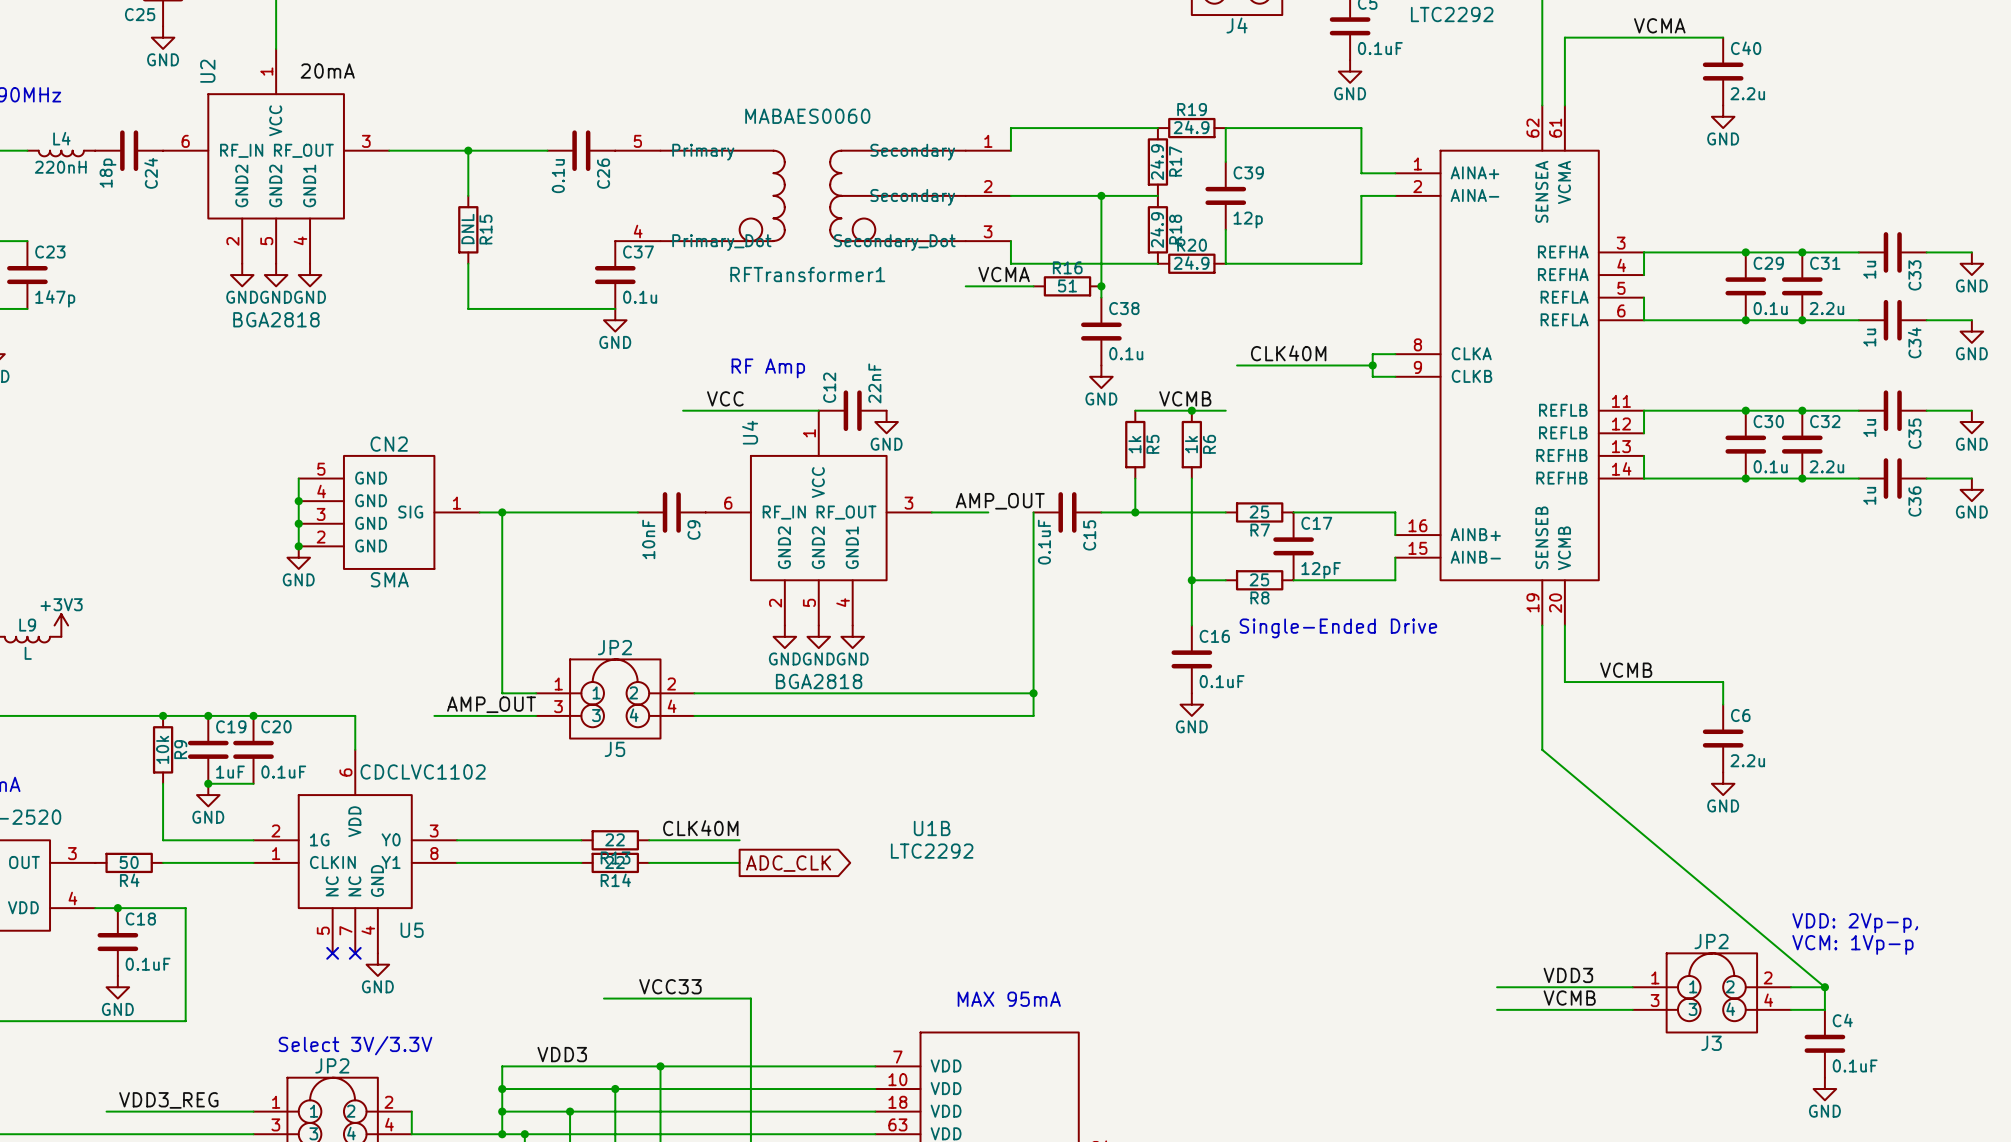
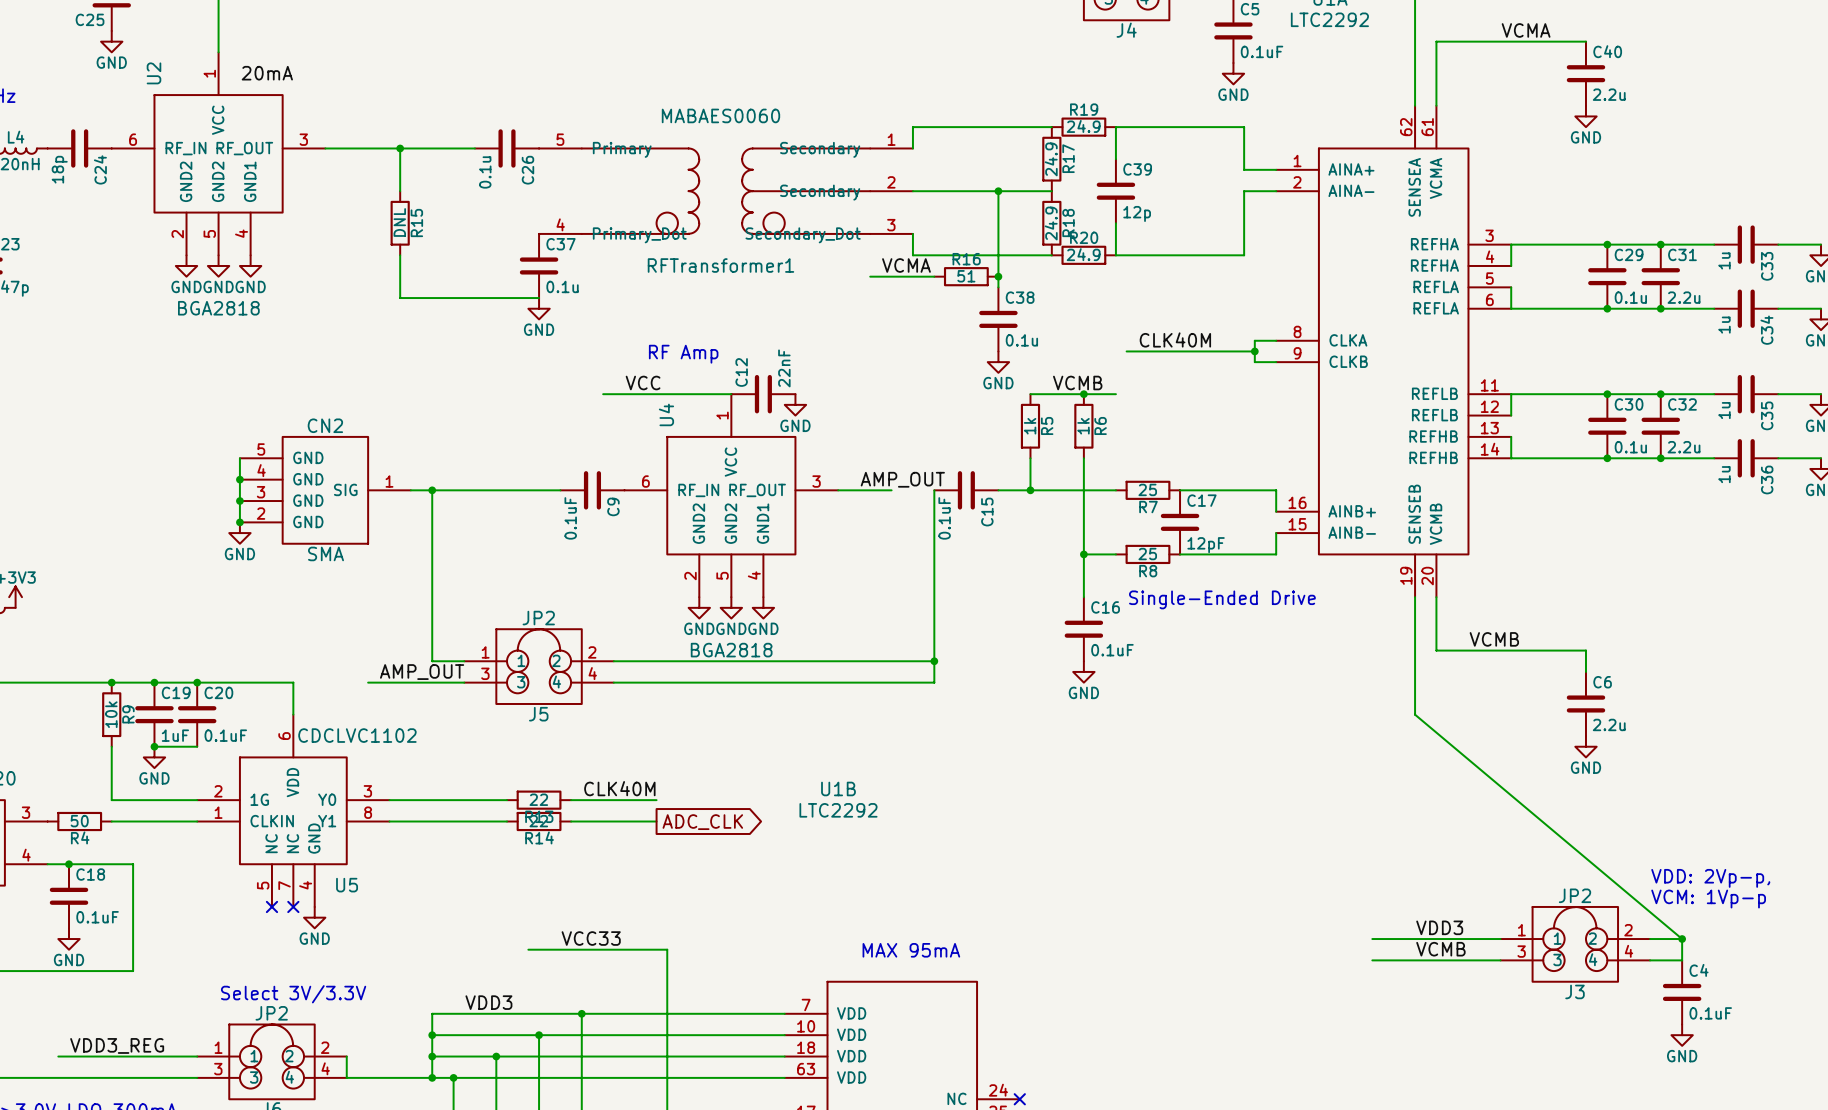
C9 value: 10nF (648, 539) -> 0.1uF (570, 518)

